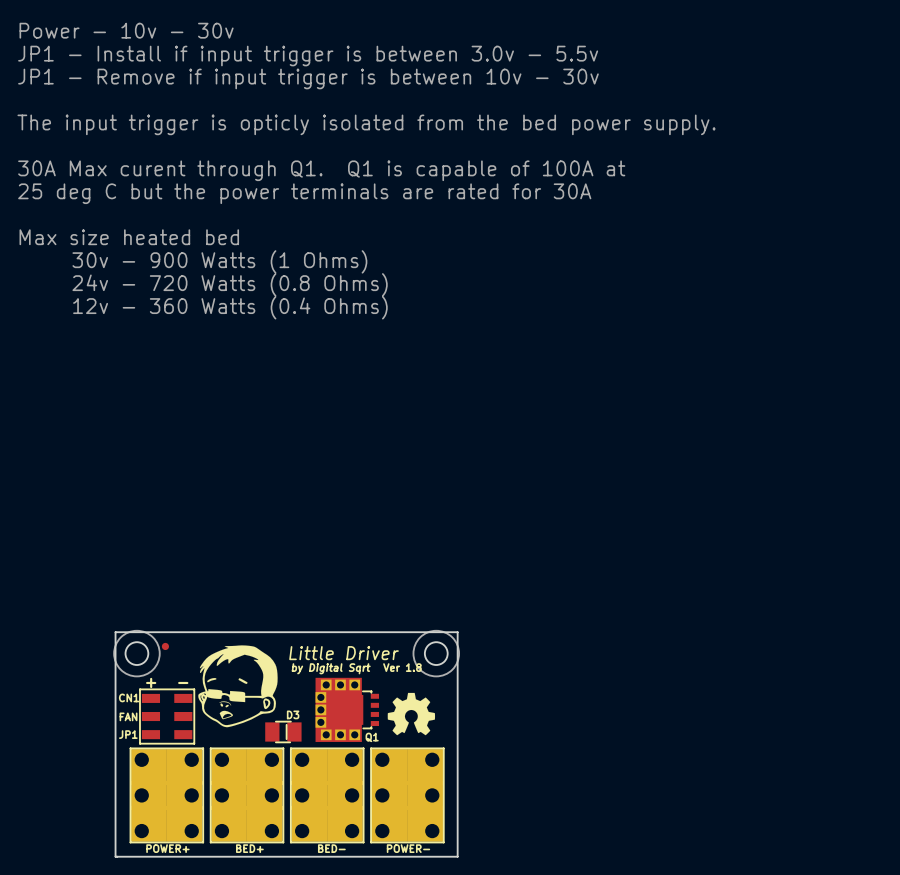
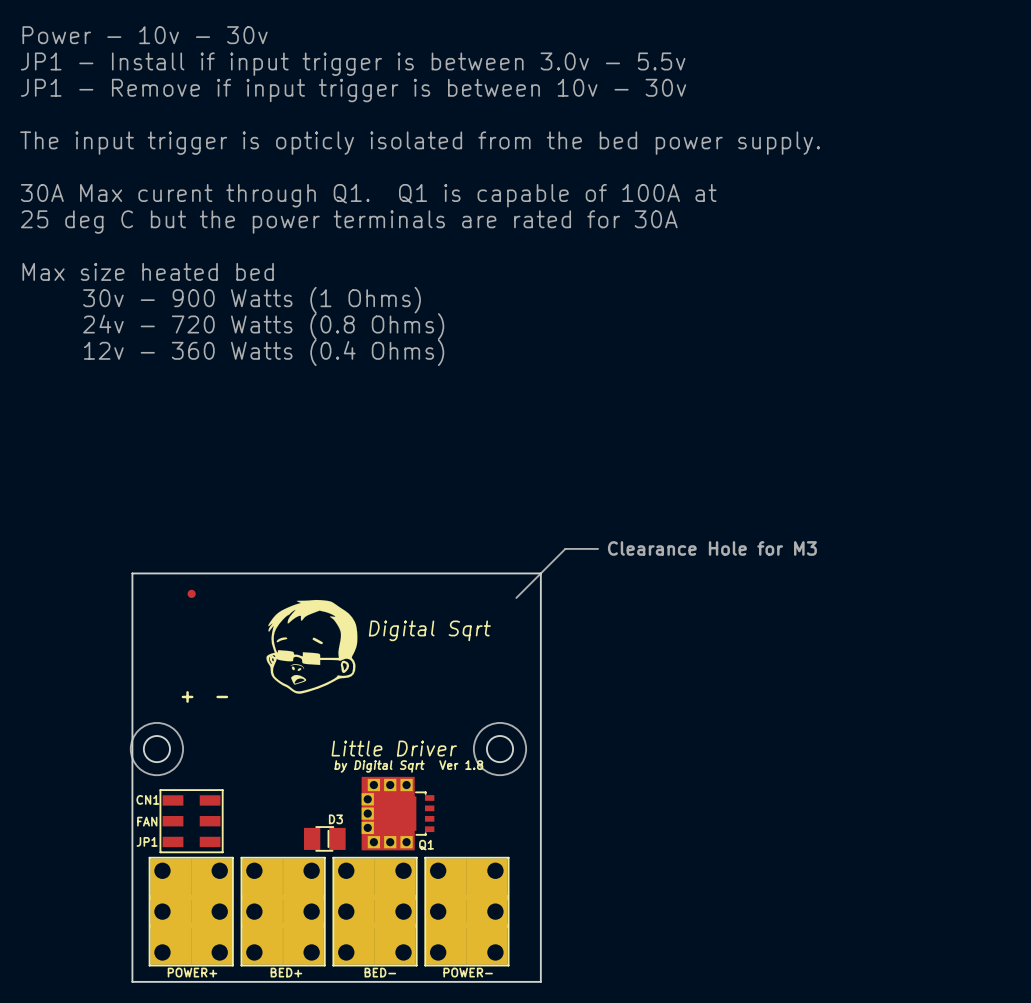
line: none -> (598, 548) (565, 548) (516, 597)
text: none -> Clearance Hole for M3 (712, 548)
text: none -> Digital Sqrt (429, 630)
board edge: (115, 632) (457, 632) (457, 856) -> (132, 724) (132, 573) (540, 573) (540, 981) (524, 981)
part position: (165, 646) -> (191, 593)
text position: + (151, 682) -> + (187, 696)
text position: - (183, 682) -> - (222, 696)
drawing position: (237, 686) -> (311, 646)
drawing: [387, 692, 436, 736] -> none

